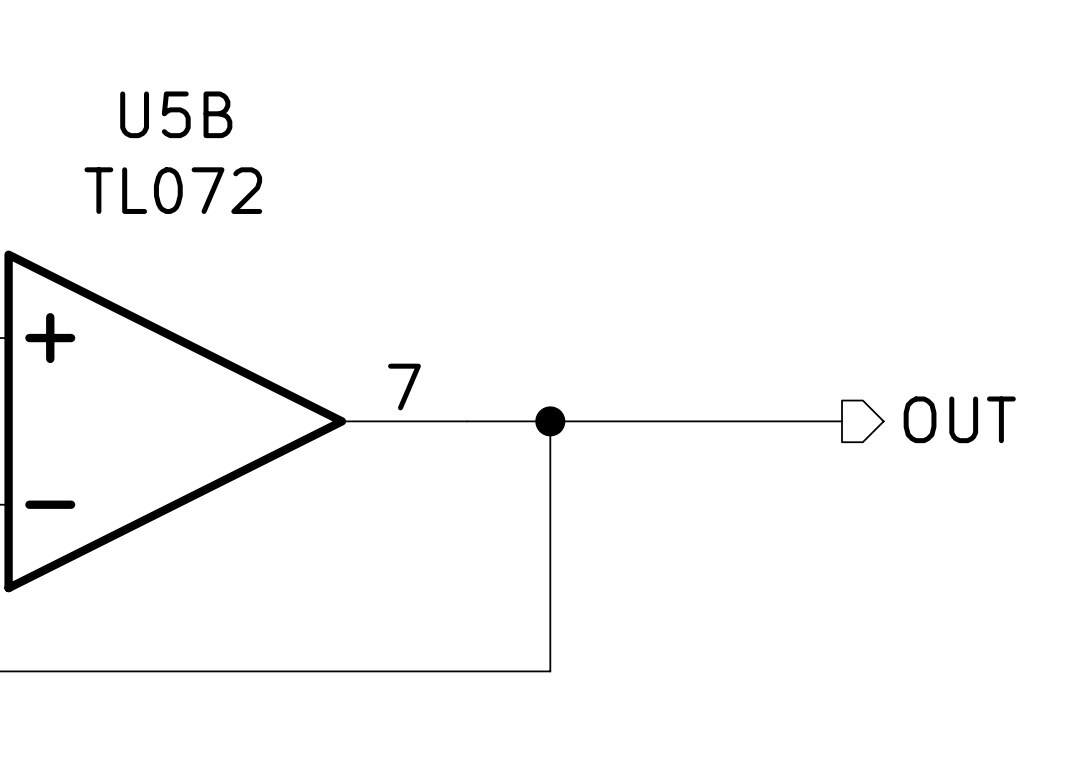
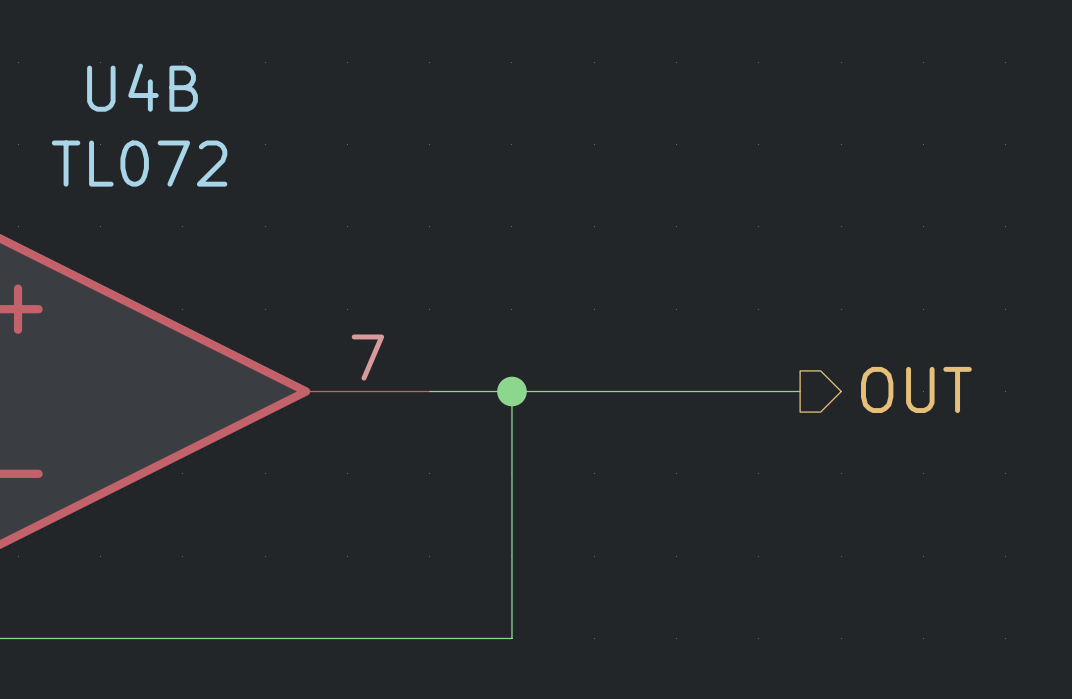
U5B name: U5B (176, 114) -> U4B (142, 87)

